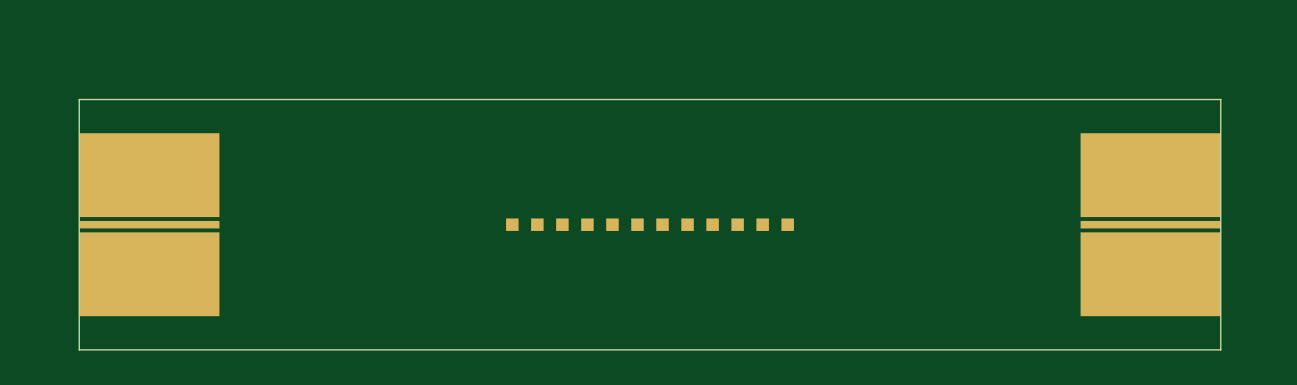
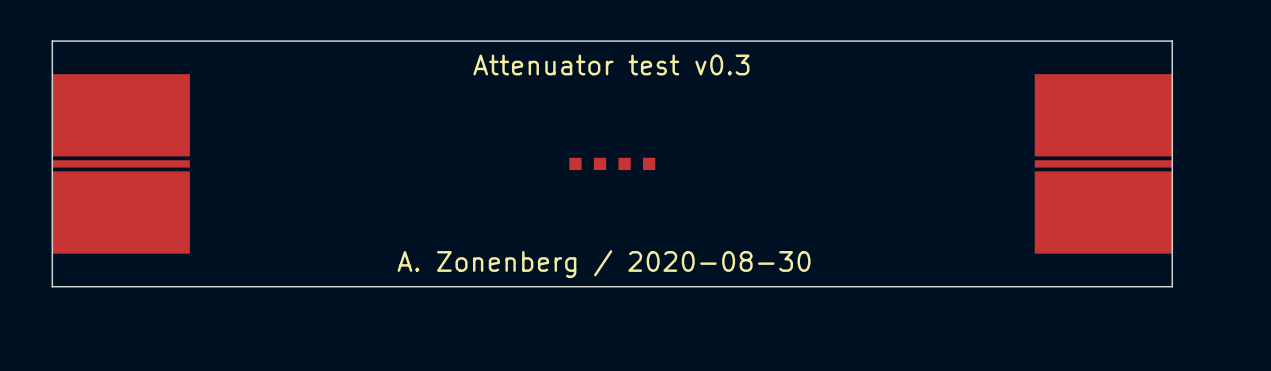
text: none -> Attenuator test v0.3 (611, 64)
part: (524, 224) -> none
part: (574, 224) -> none
part: (725, 224) -> none
part: (775, 224) -> none
text: none -> A. Zonenberg / 2020-08-30 (604, 264)

